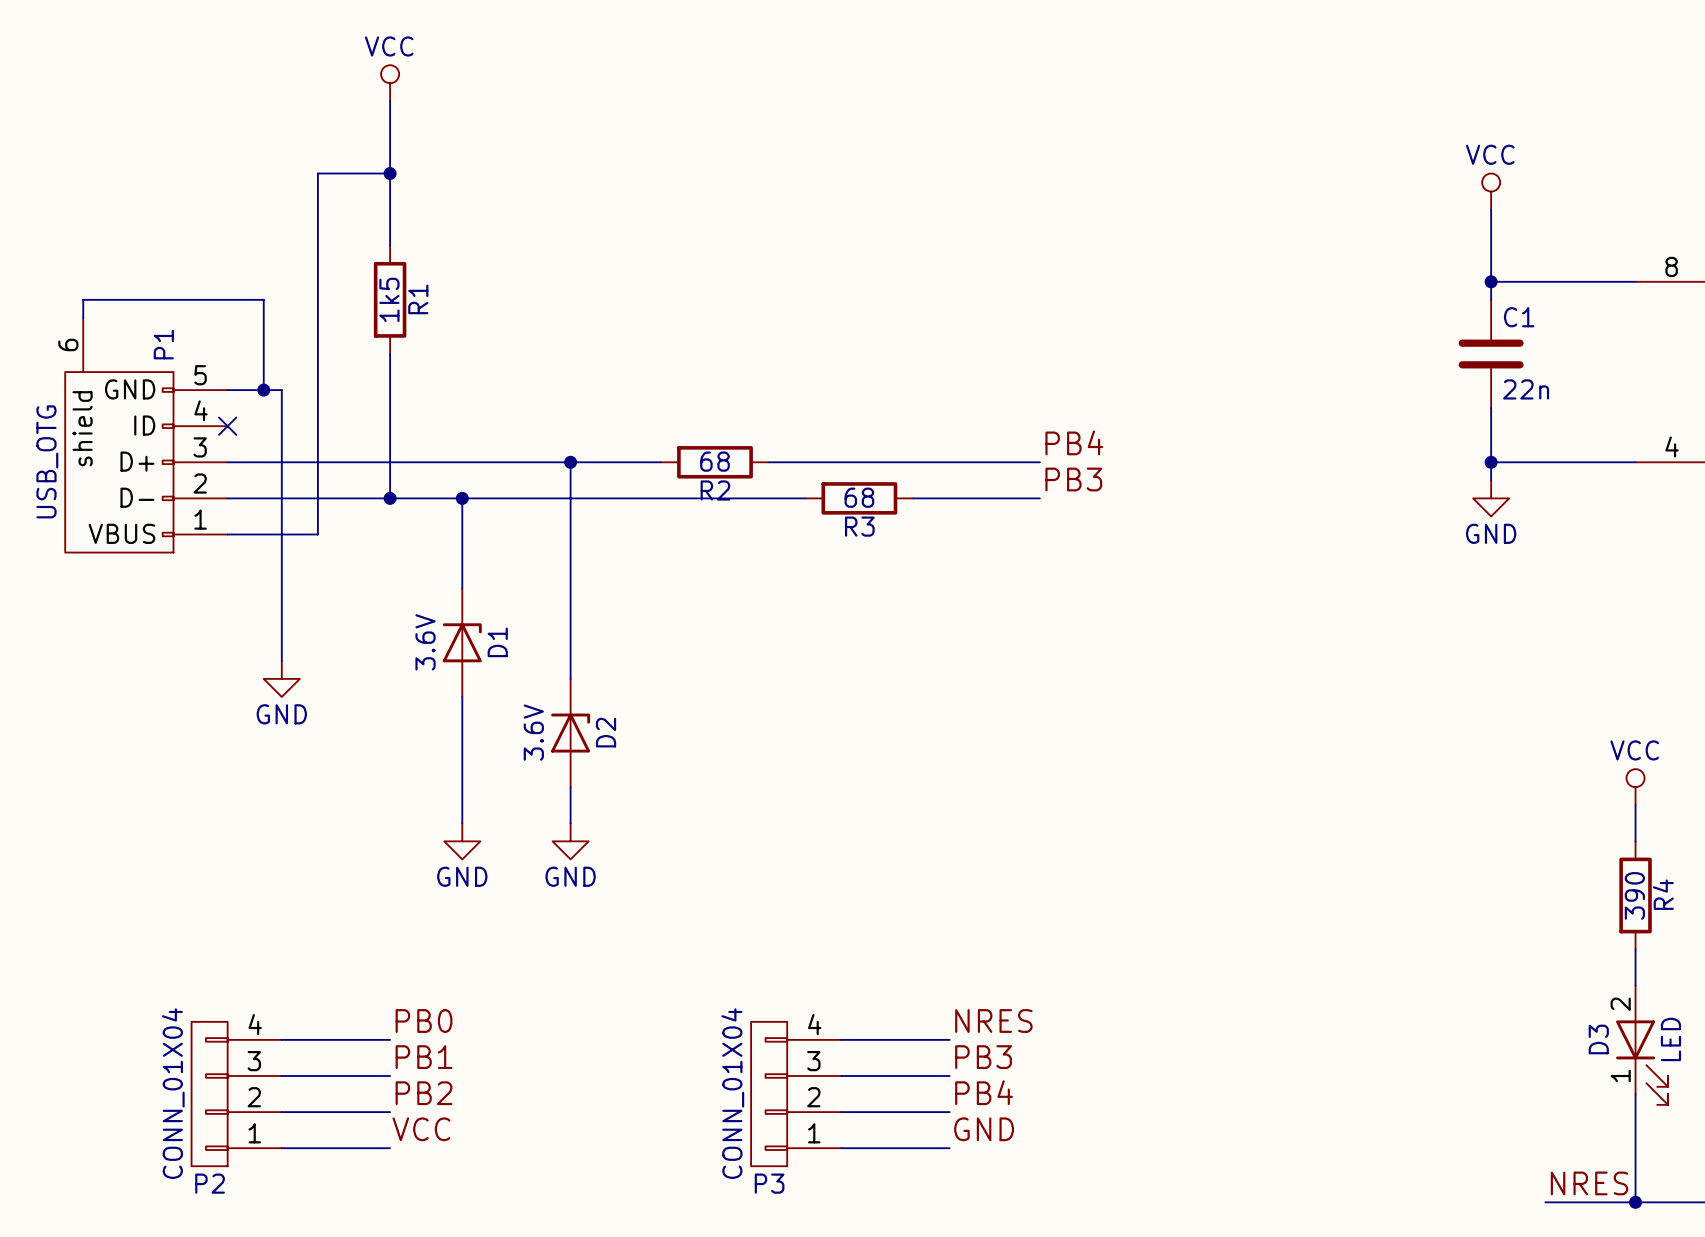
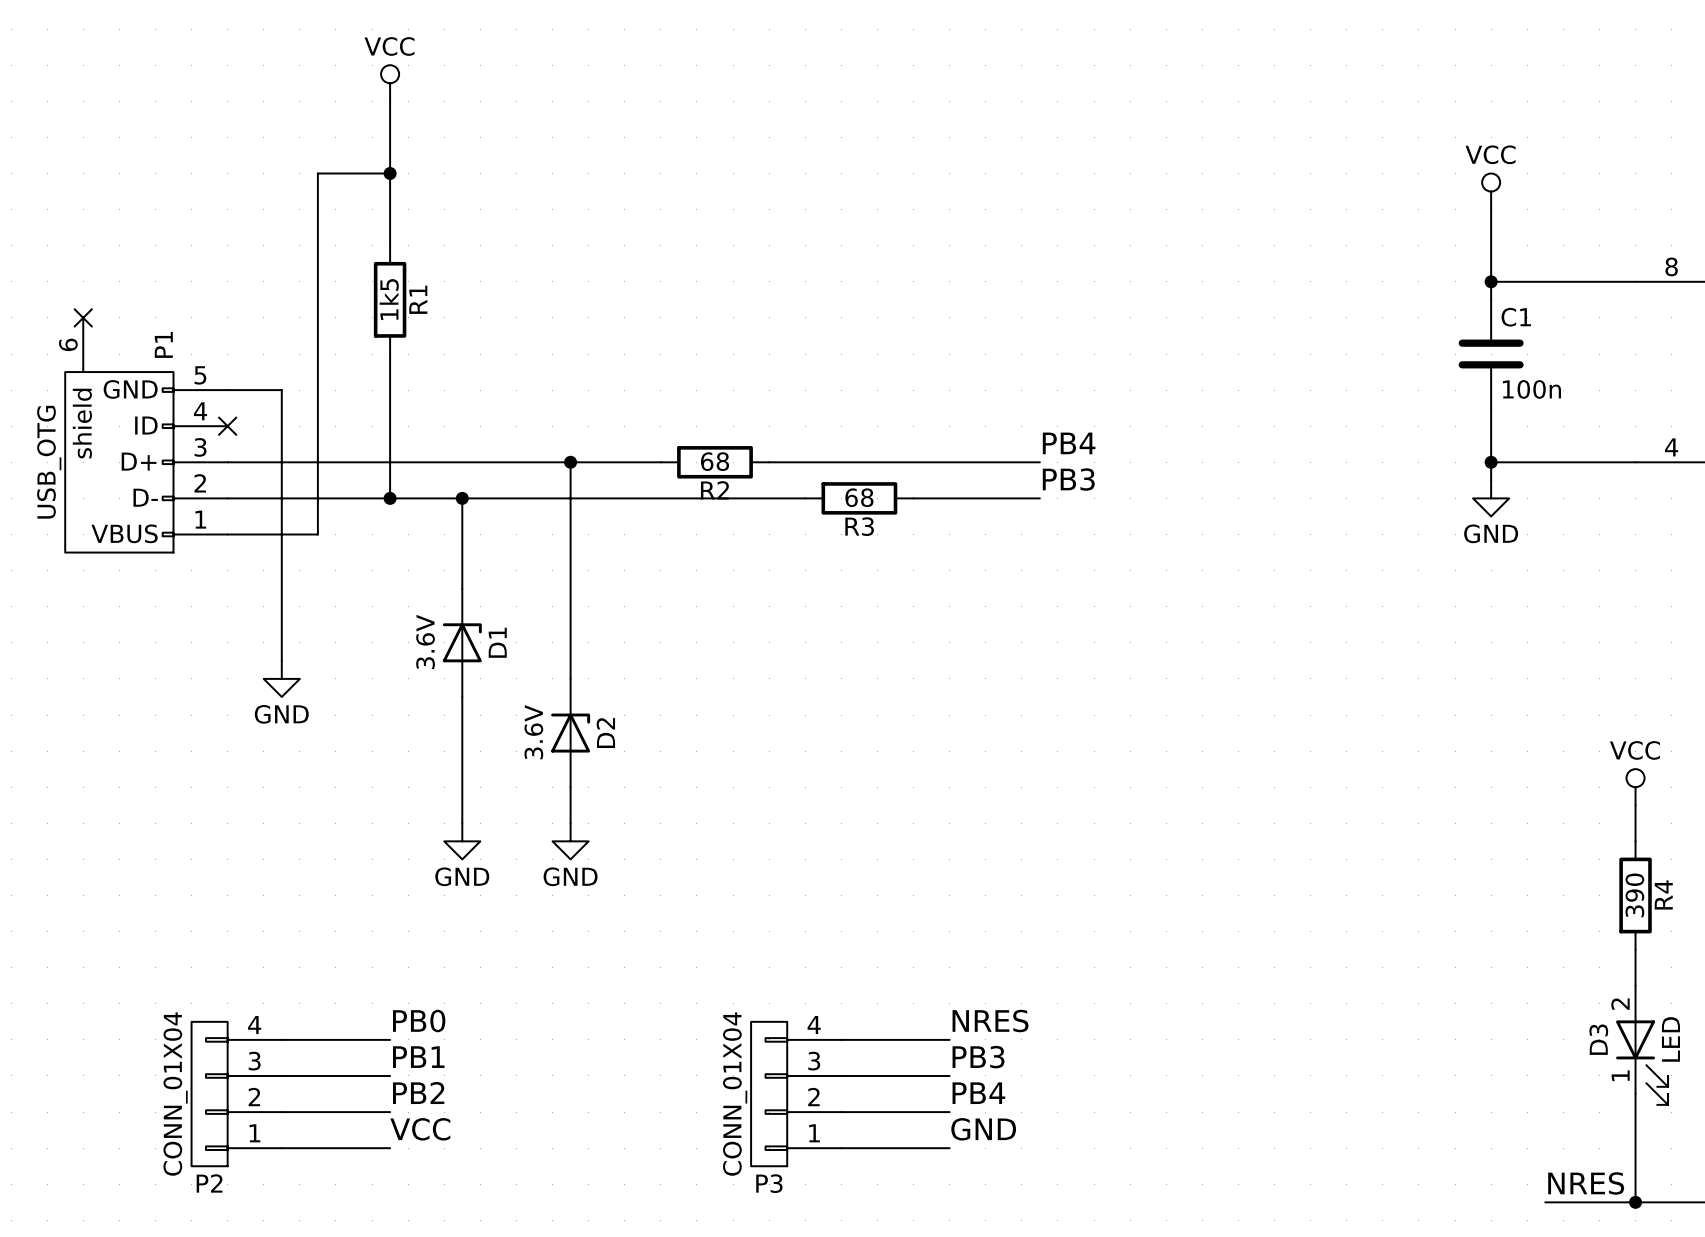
wire: (83, 317) (83, 299) (263, 299) (263, 390) -> none
no-connect mark: none -> (83, 317)
C1 value: 22n (1526, 389) -> 100n (1531, 389)
junction: (263, 390) -> none

